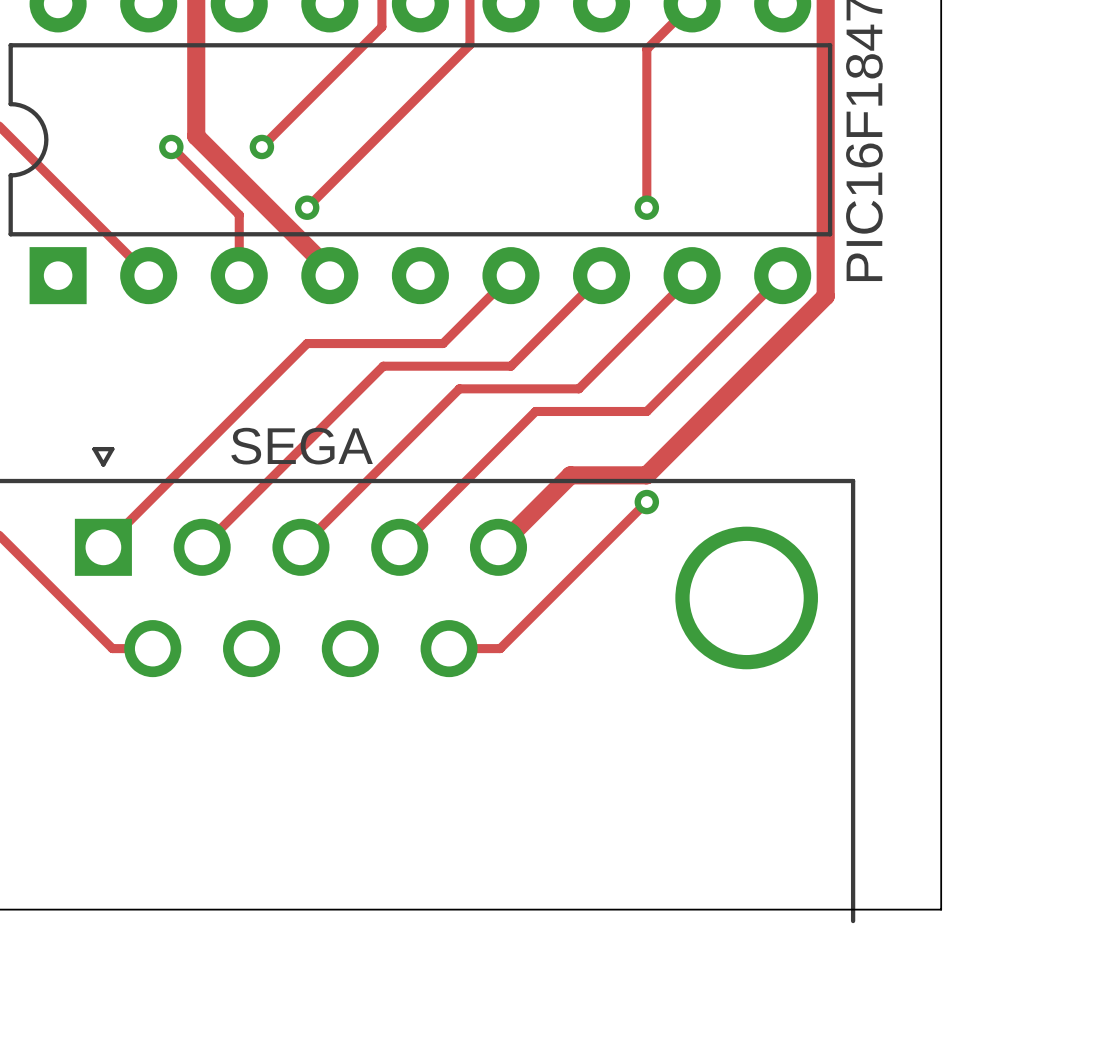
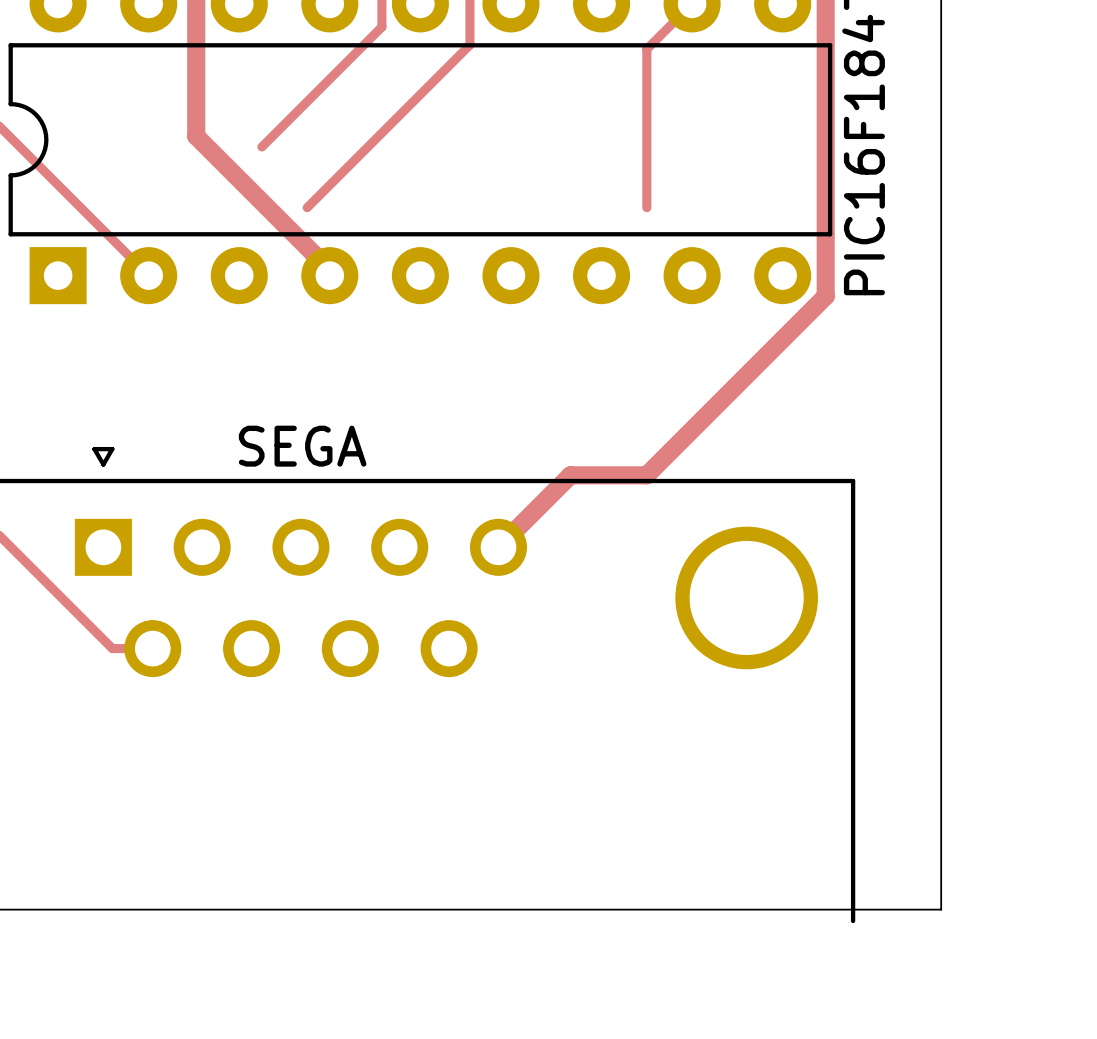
track: (171, 146) (239, 214) (239, 275) -> none
via: (171, 146) -> none
via: (261, 146) -> none
via: (307, 207) -> none
via: (646, 207) -> none
track: (510, 275) (443, 343) (307, 343) (103, 547) -> none
track: (601, 275) (510, 366) (383, 366) (202, 547) -> none
track: (692, 275) (578, 388) (459, 388) (300, 547) -> none
track: (782, 275) (646, 411) (535, 411) (399, 547) -> none
track: (646, 502) (500, 648) (449, 648) -> none
via: (646, 502) -> none

